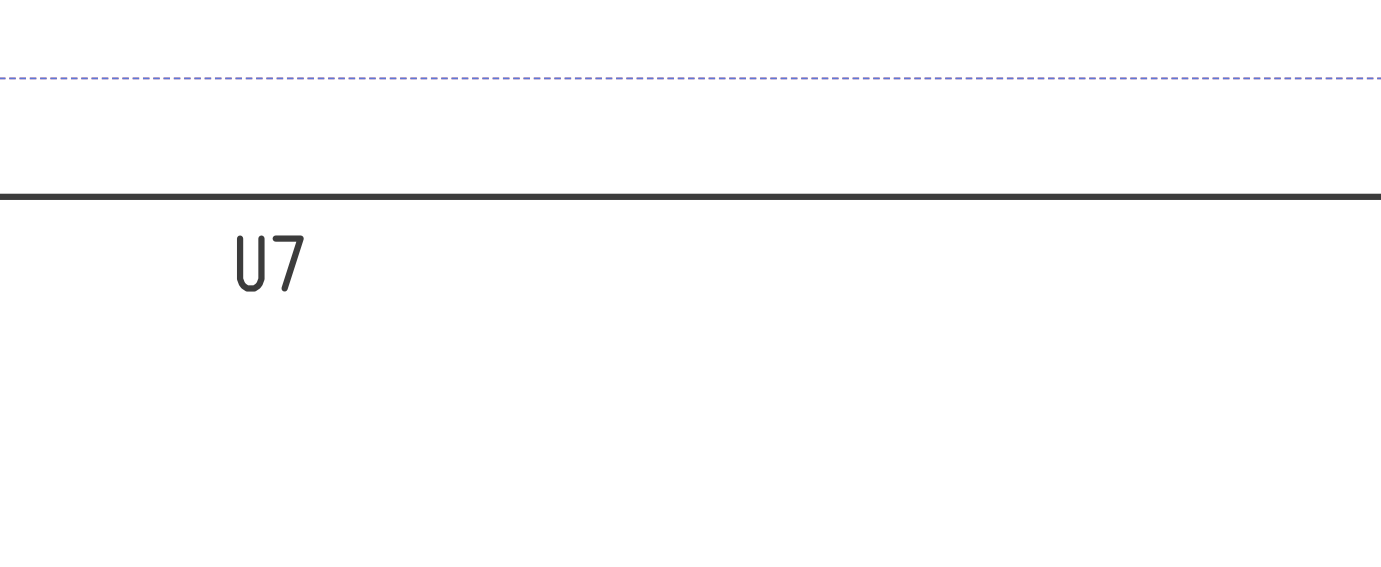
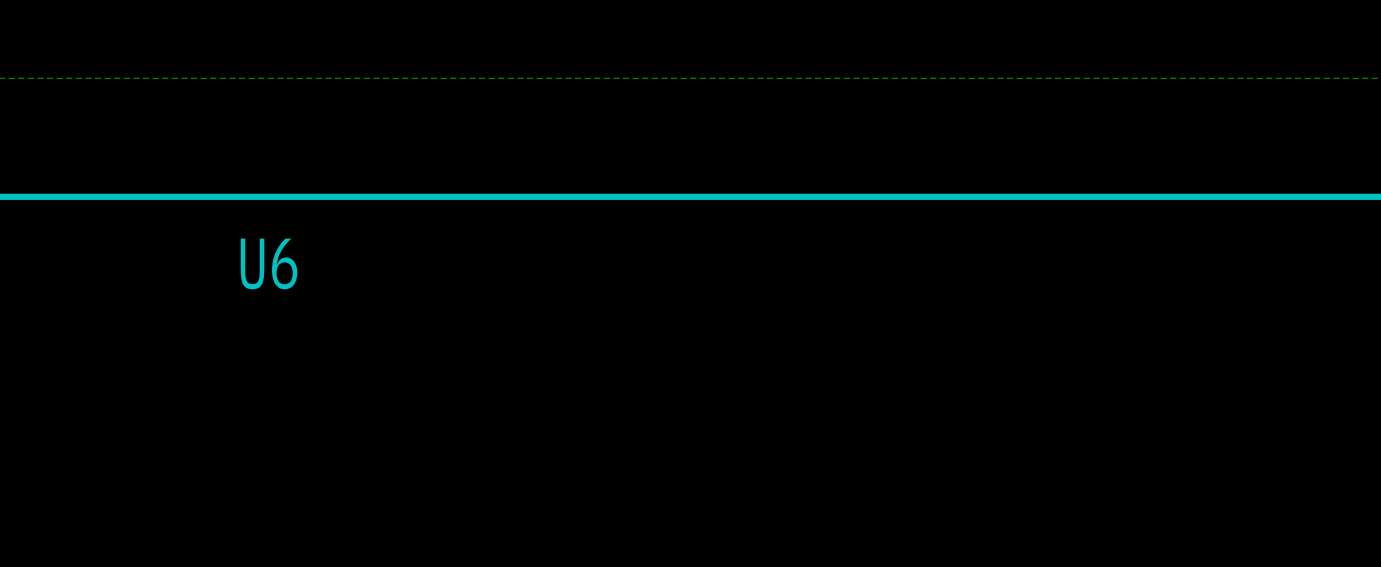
U7 name: U7 (270, 263) -> U6 (269, 263)

